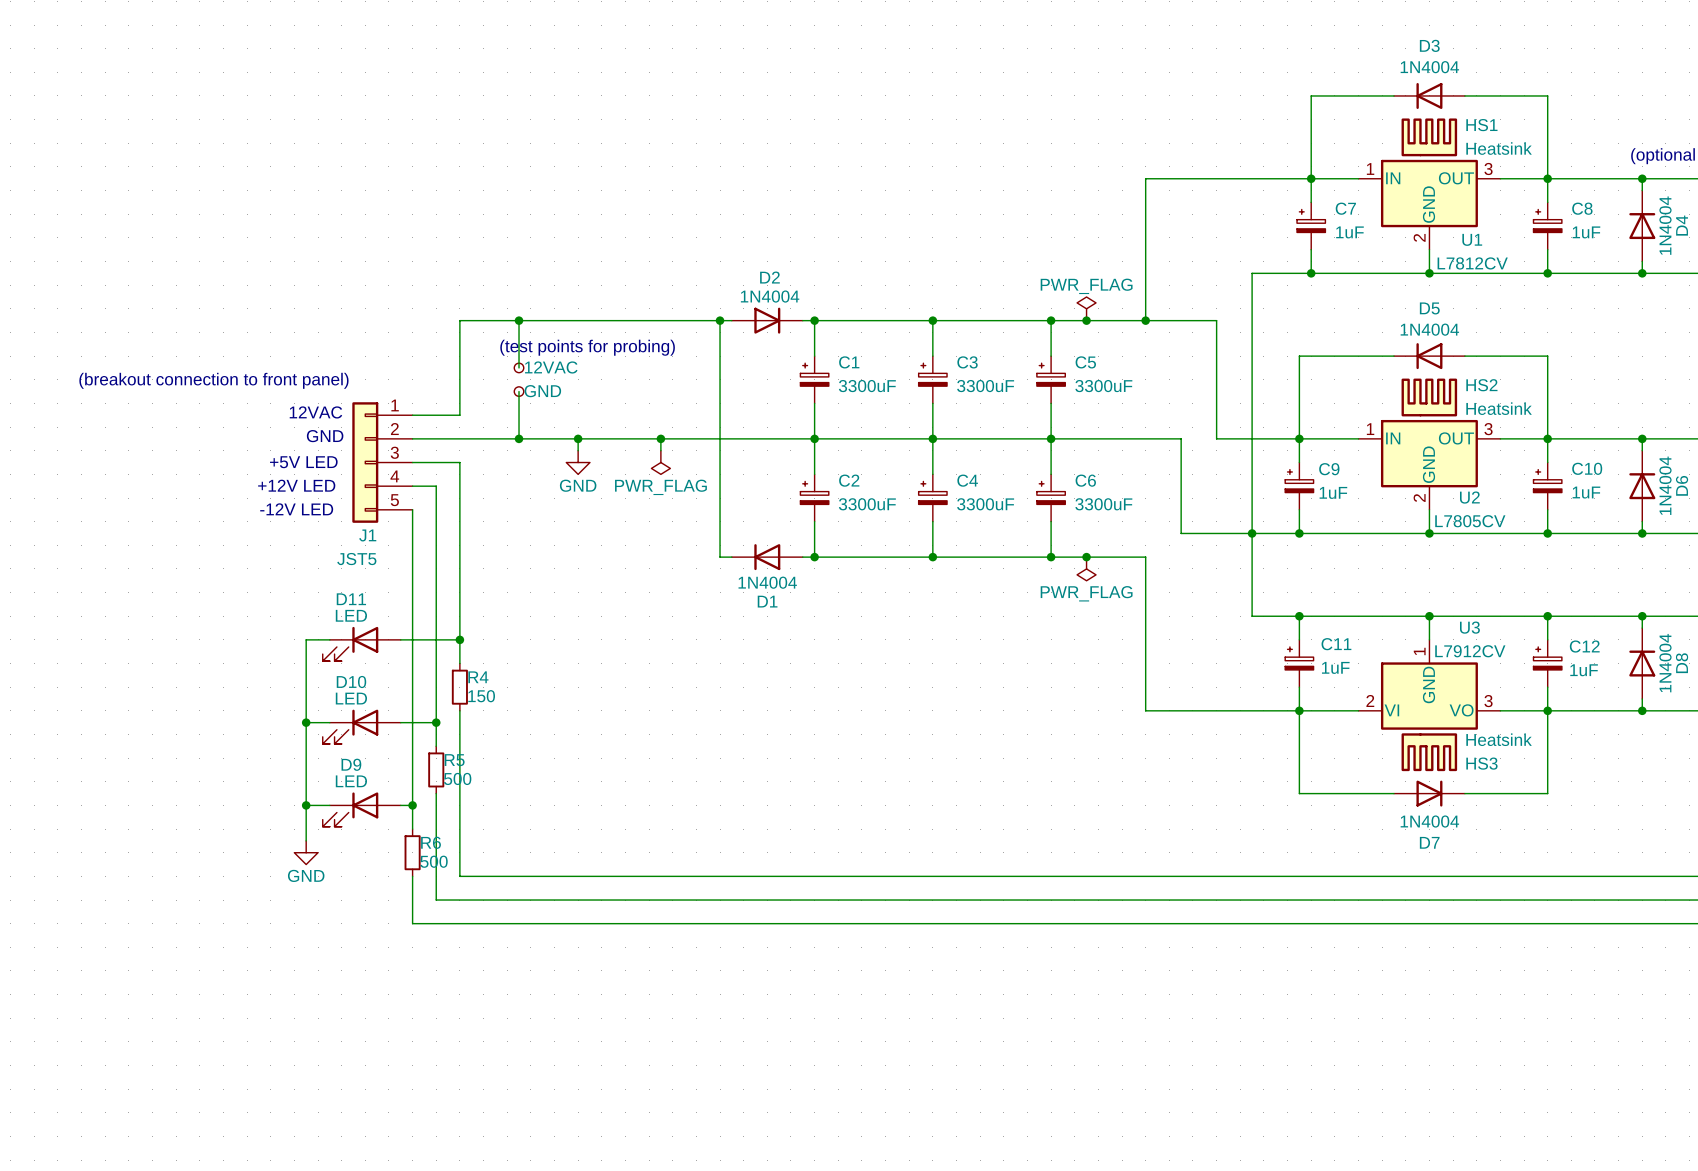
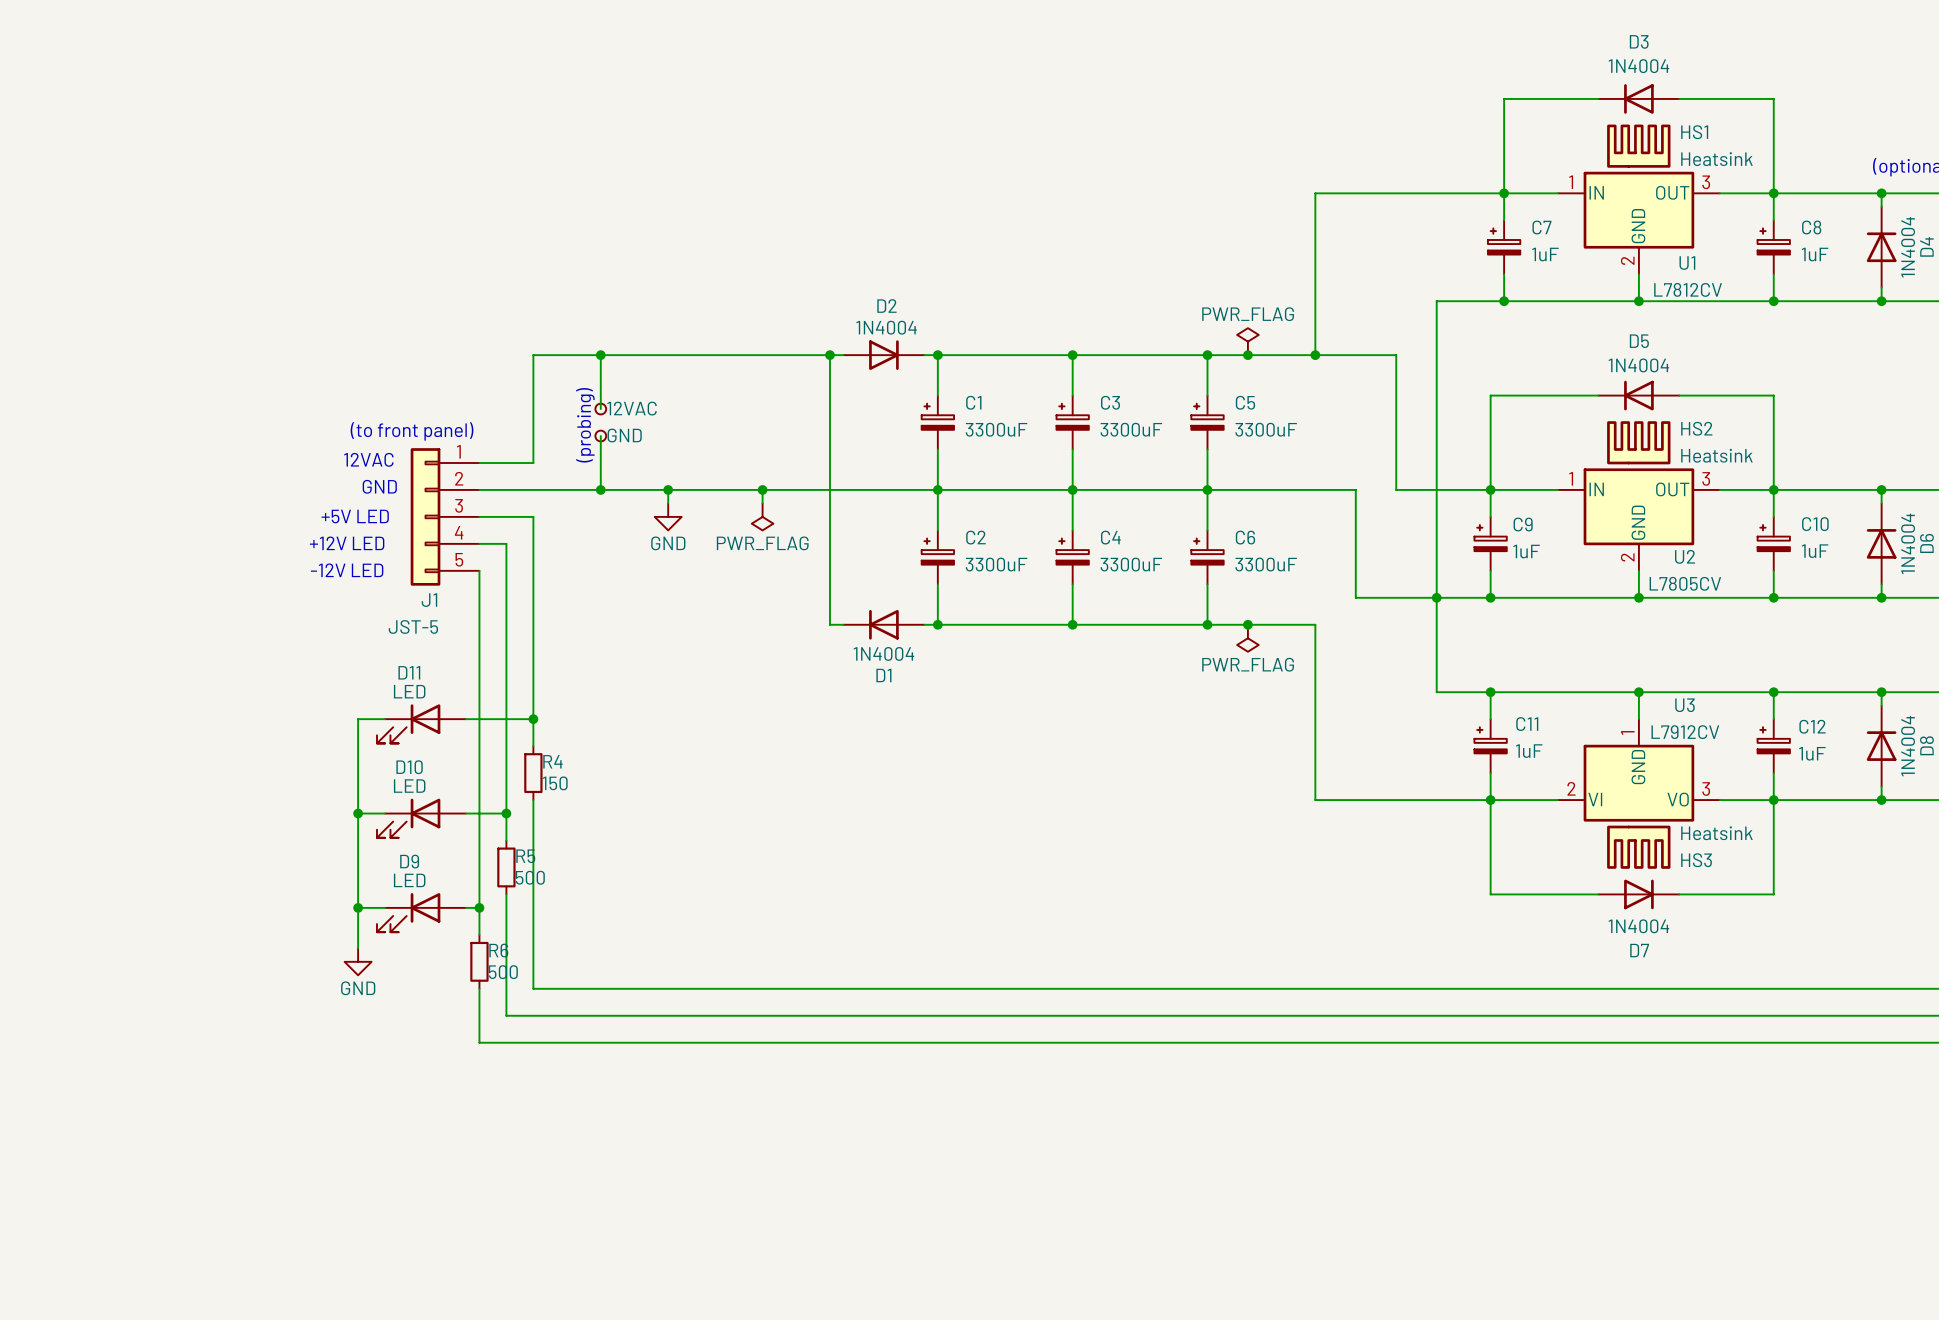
text: (test points for probing) (587, 347) -> none
text: (breakout connection to front panel) (213, 380) -> (to front panel) (412, 431)
text: none -> (probing) (585, 425)
J1 value: JST5 (356, 559) -> JST-5 (413, 626)

